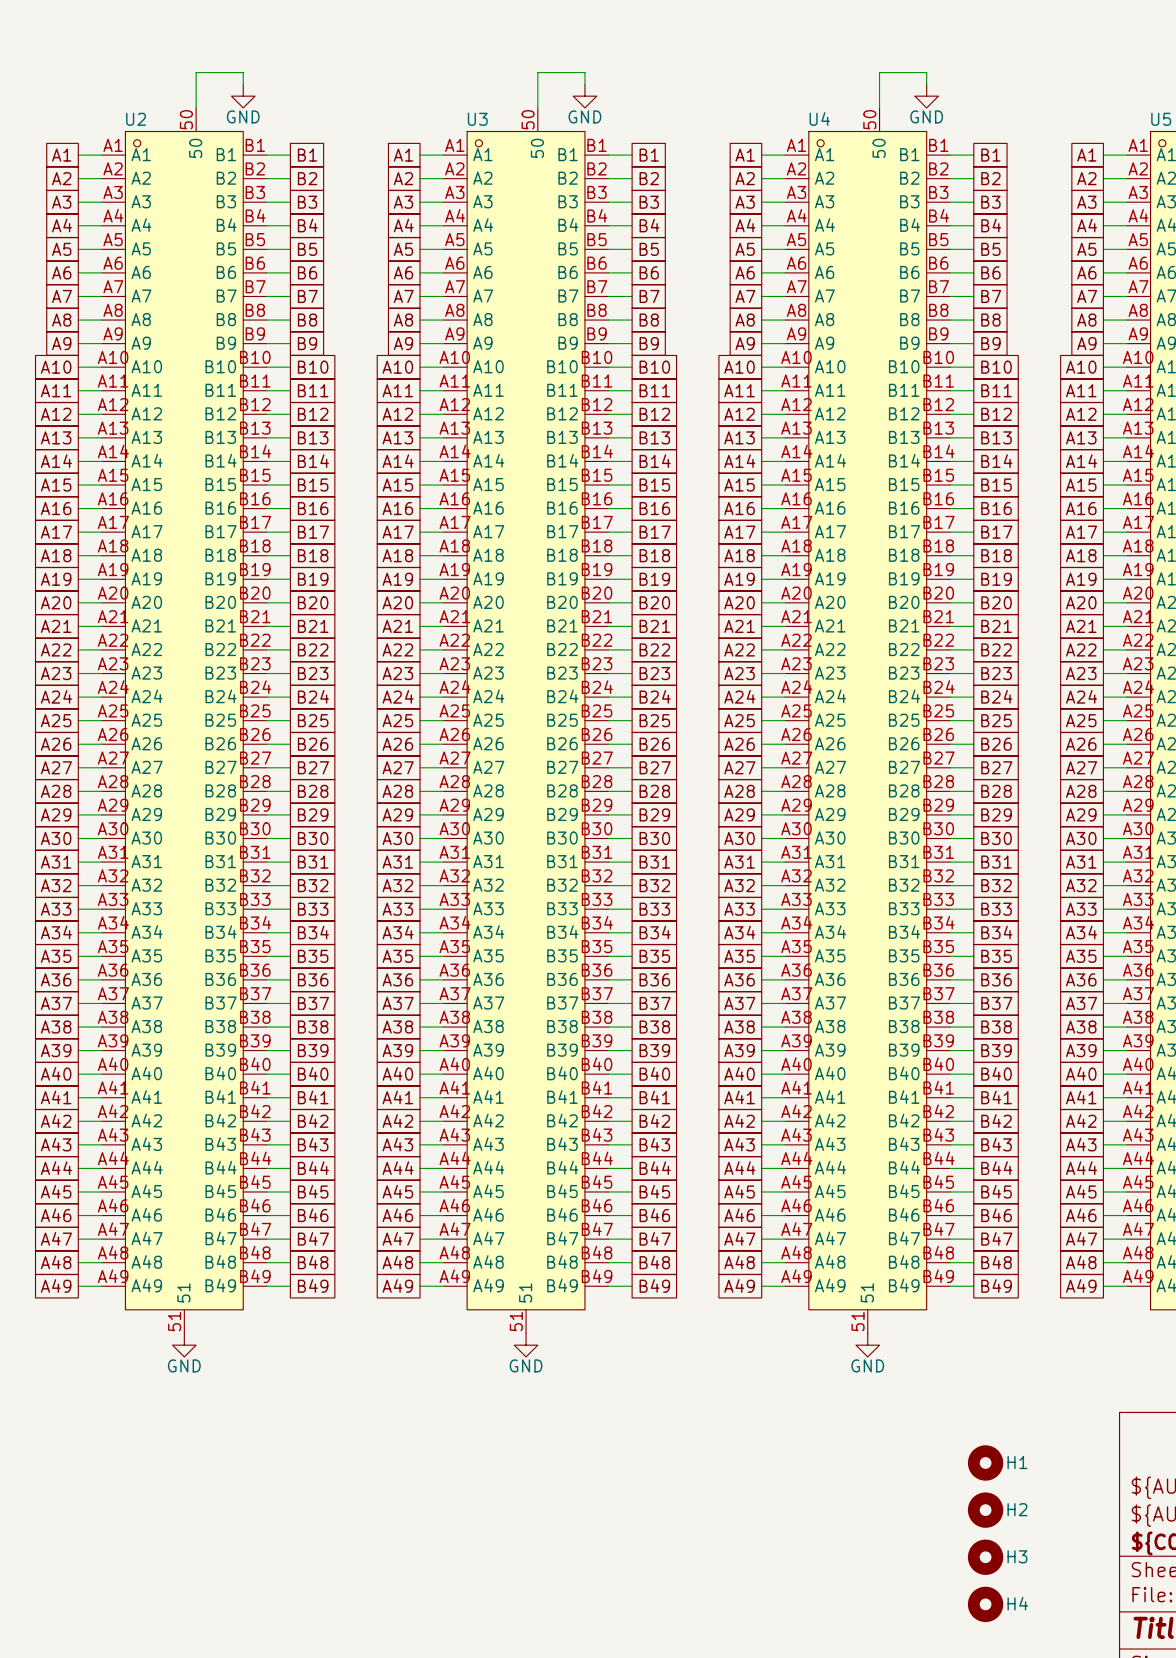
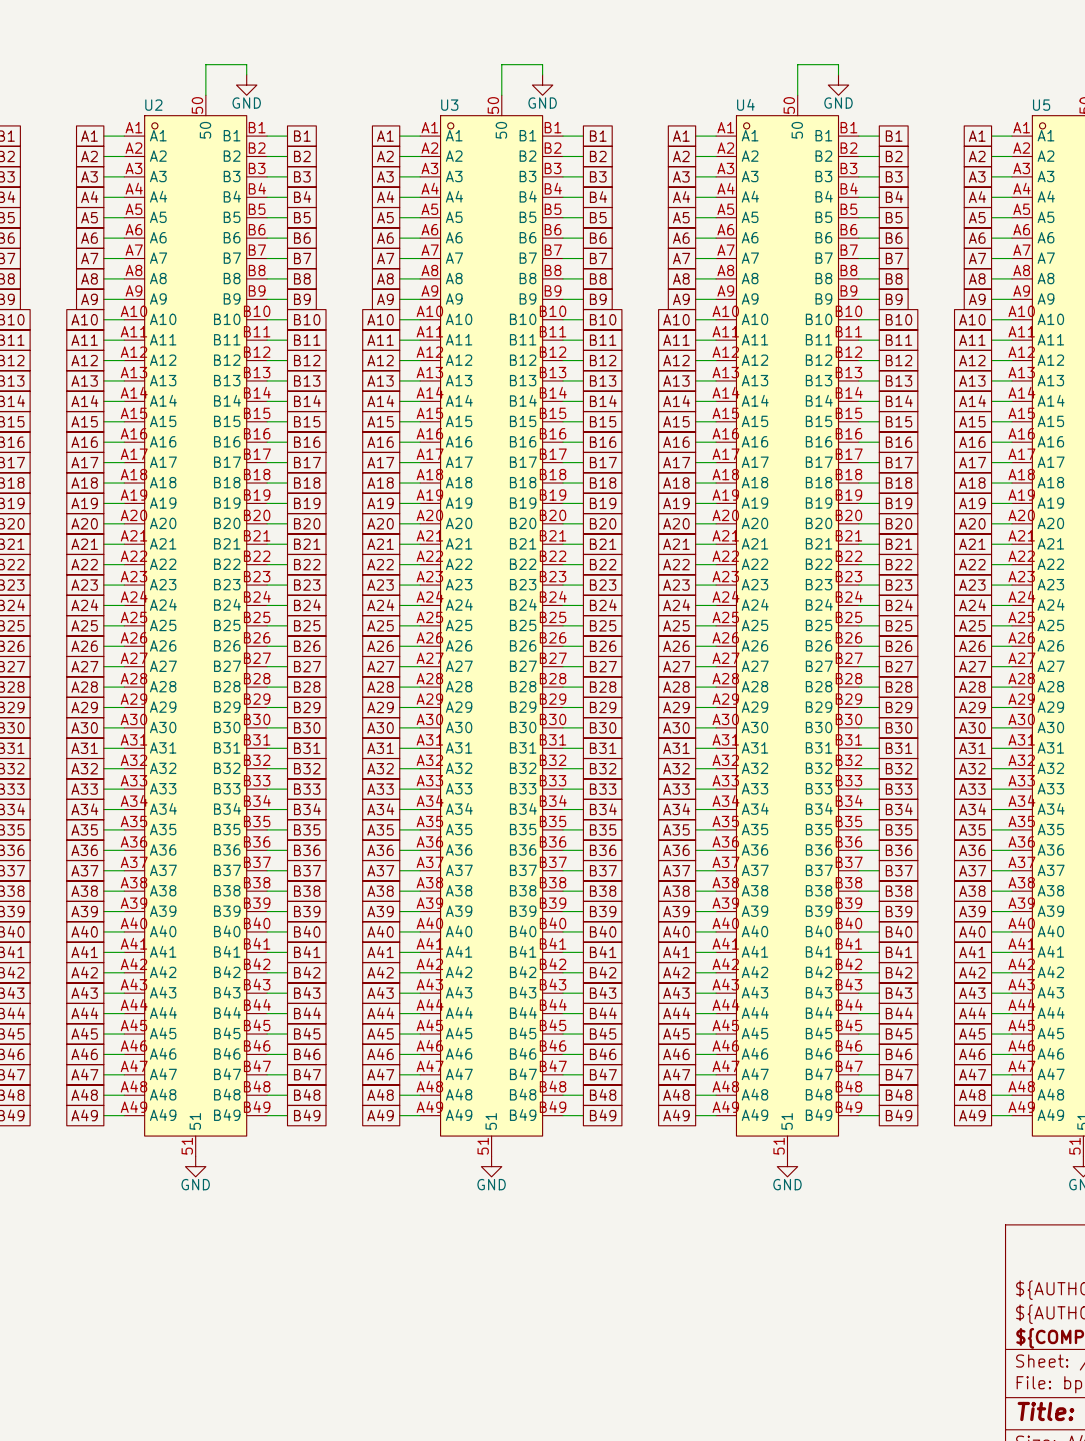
H1: (985, 1462) -> none
H2: (985, 1510) -> none
H3: (985, 1557) -> none
H4: (985, 1604) -> none

